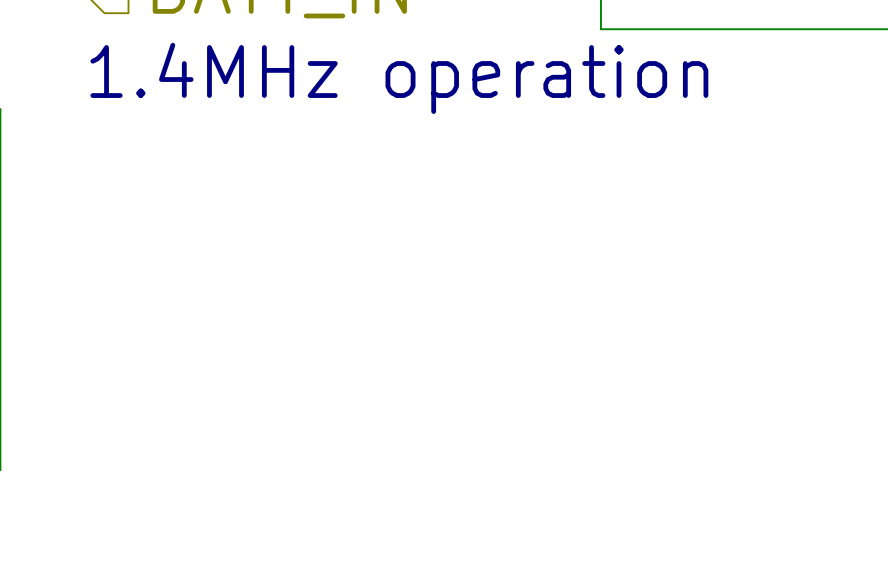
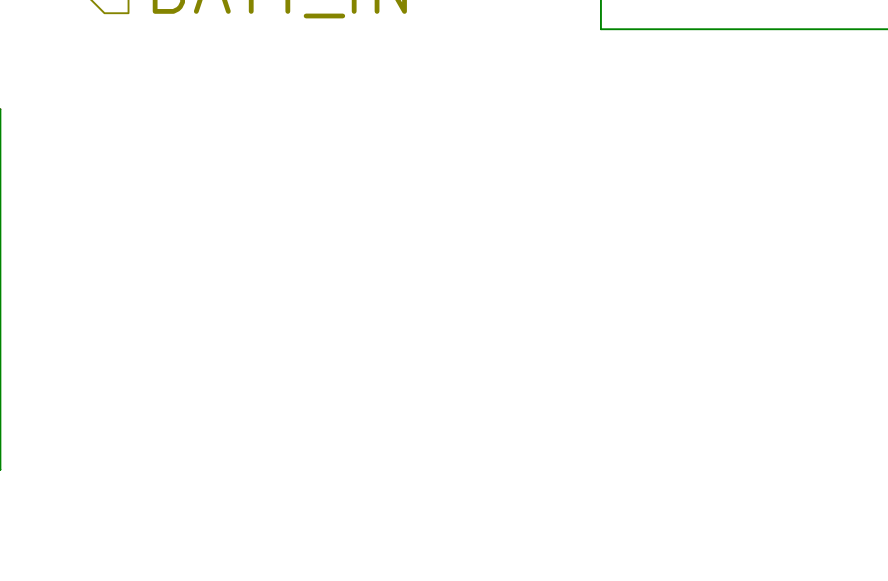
text: 1.4MHz operation (399, 78) -> none

